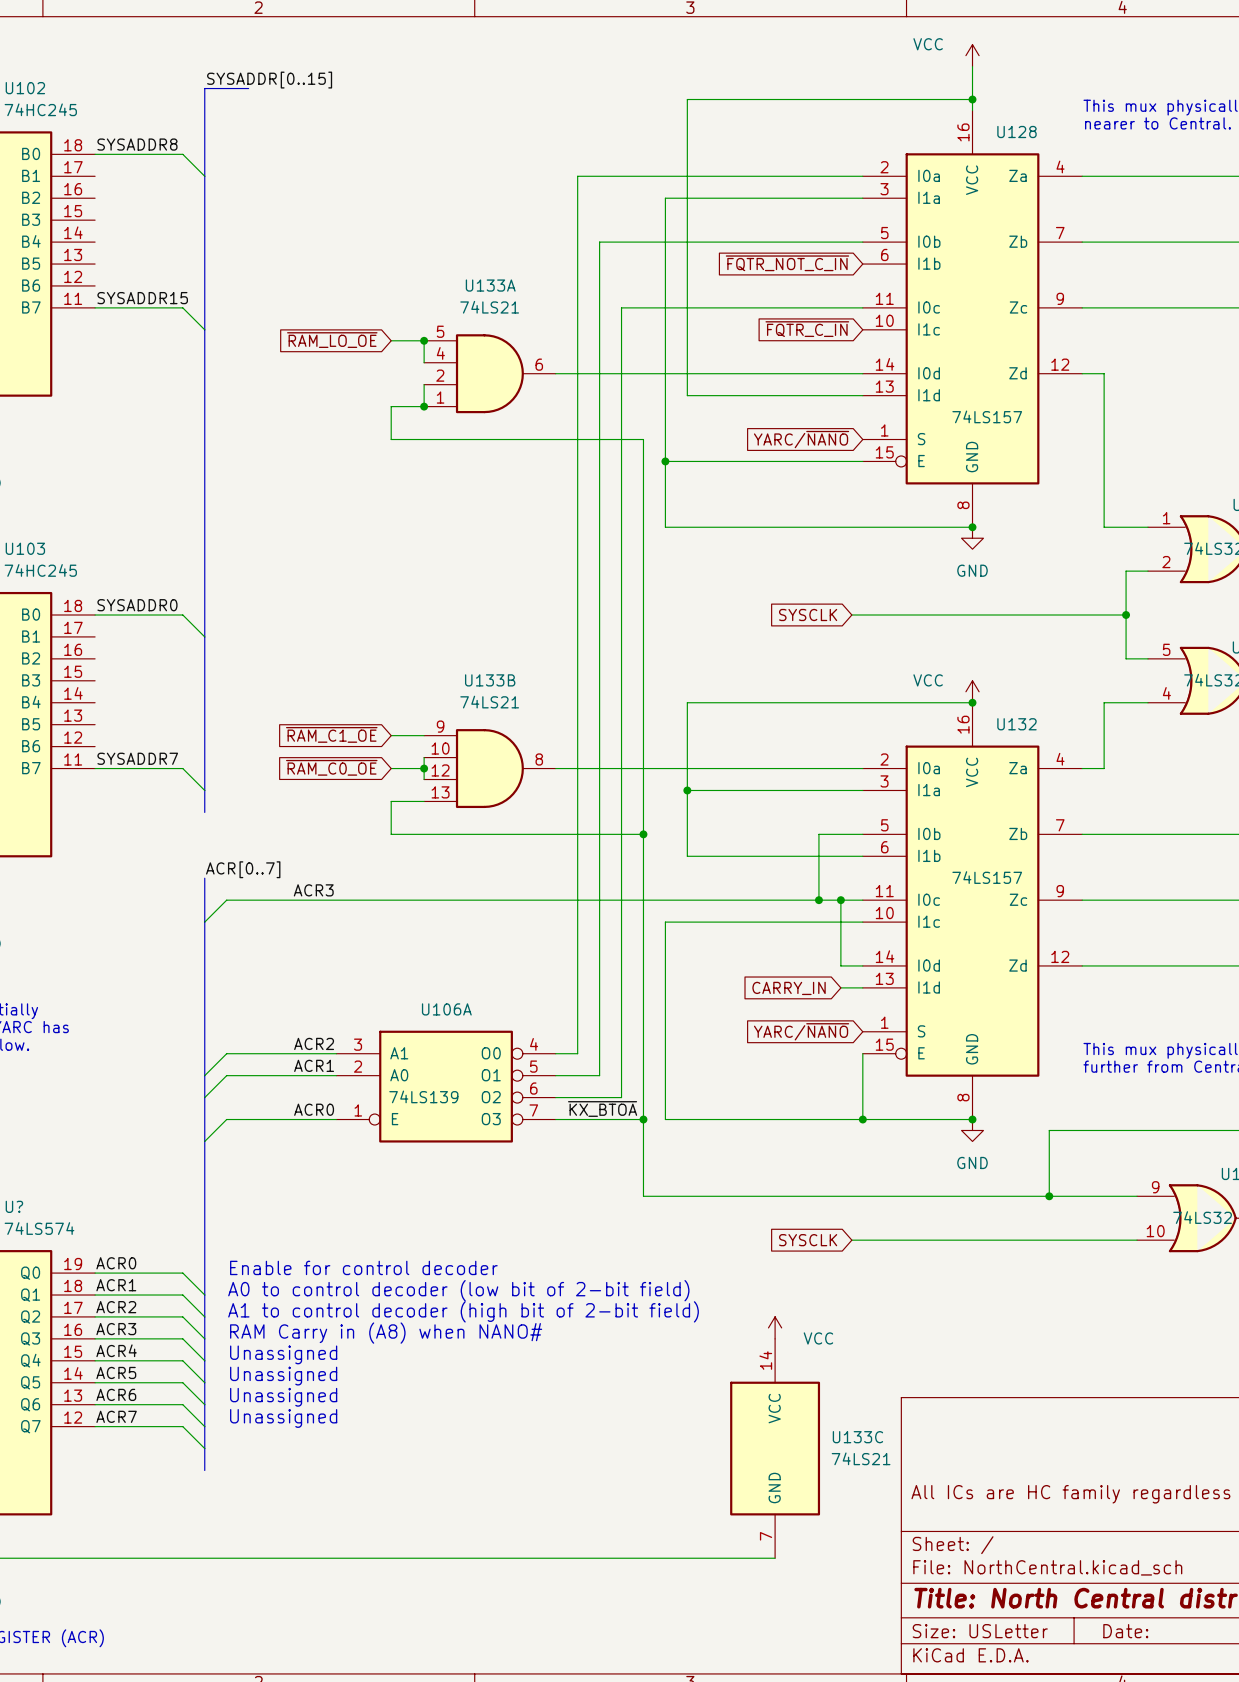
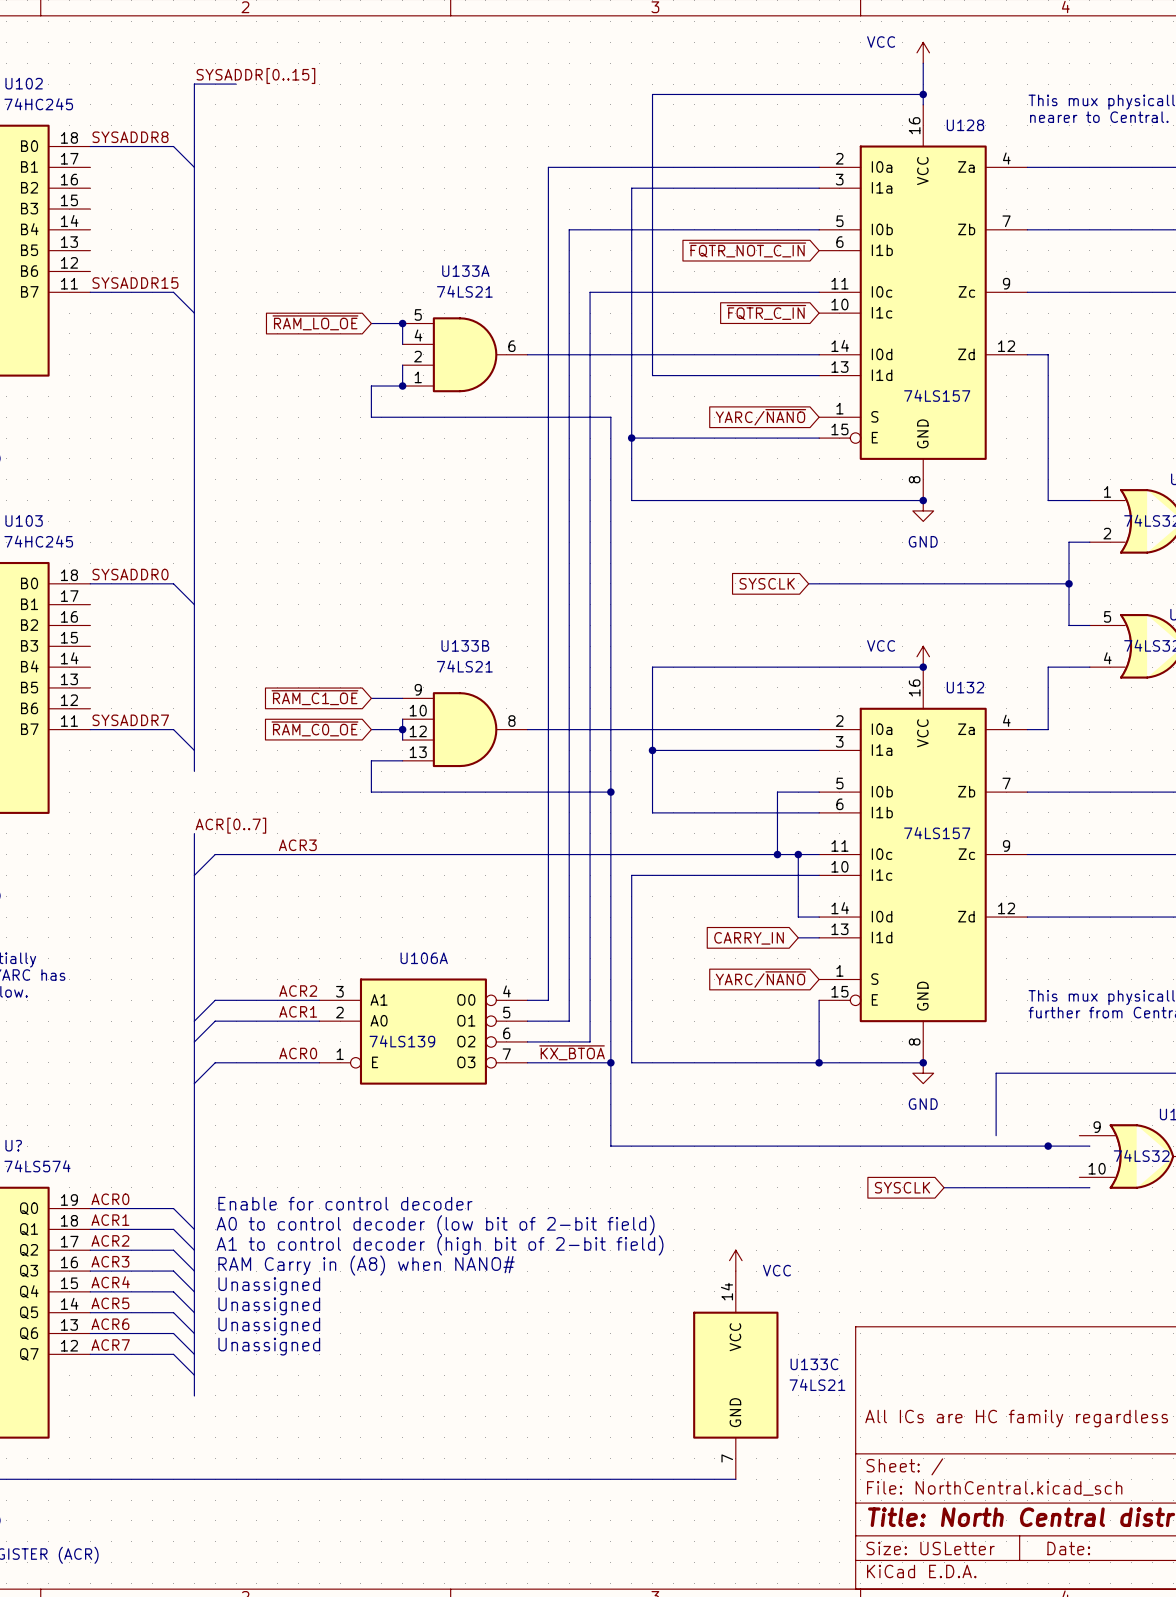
wire: (643, 1196) (1137, 1196) -> (610, 1135) (610, 1146) (1089, 1146)
junction: (1049, 1196) -> none
junction: none -> (1048, 1146)
global label position: SYSCLK (808, 1240) -> SYSCLK (902, 1187)
wire: (851, 1240) (1137, 1240) -> none
wire: none -> (944, 1187) (1089, 1187)

